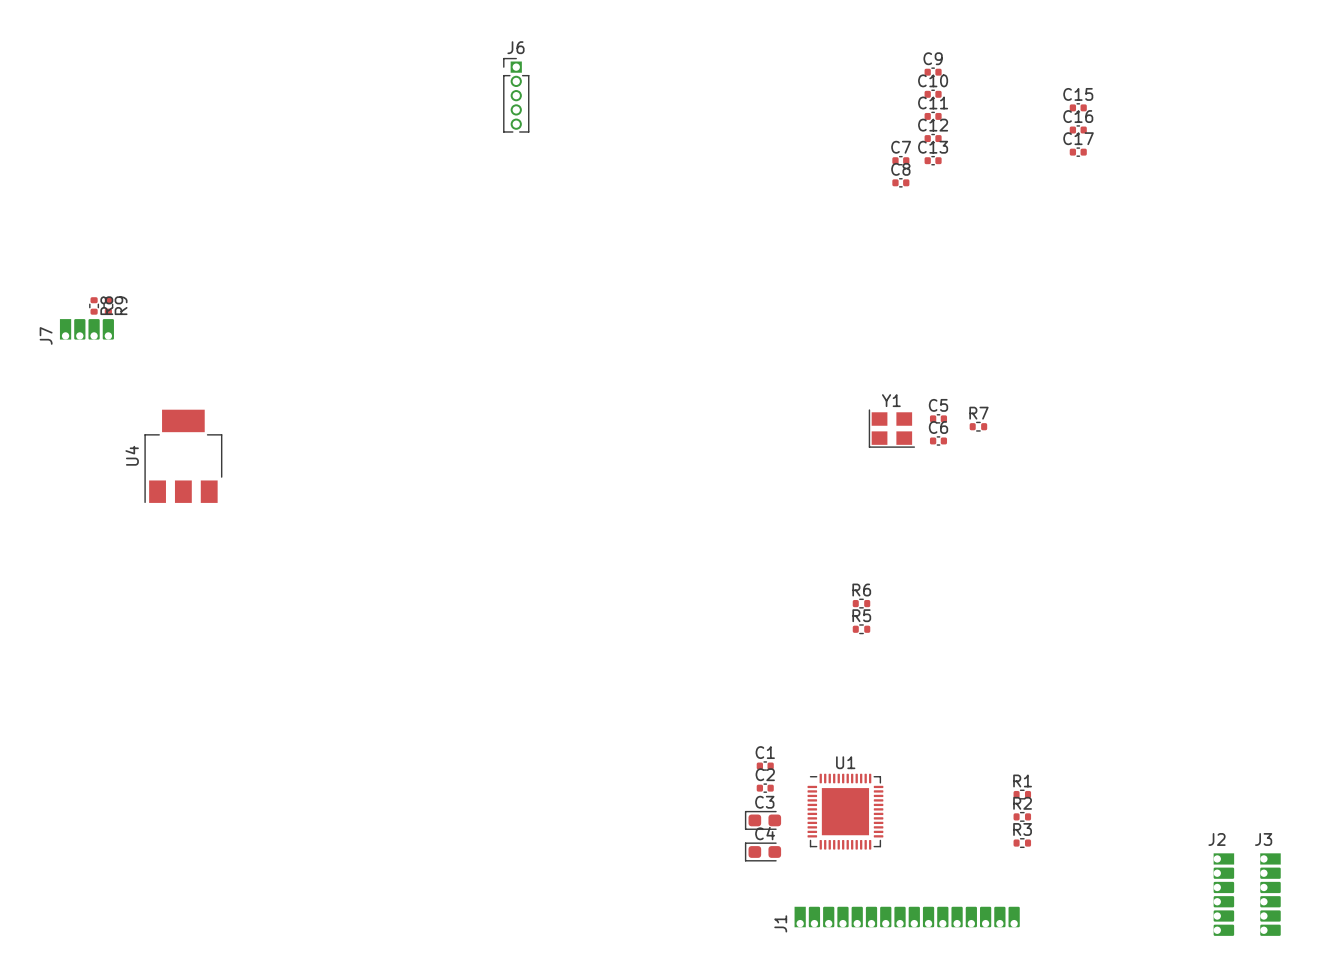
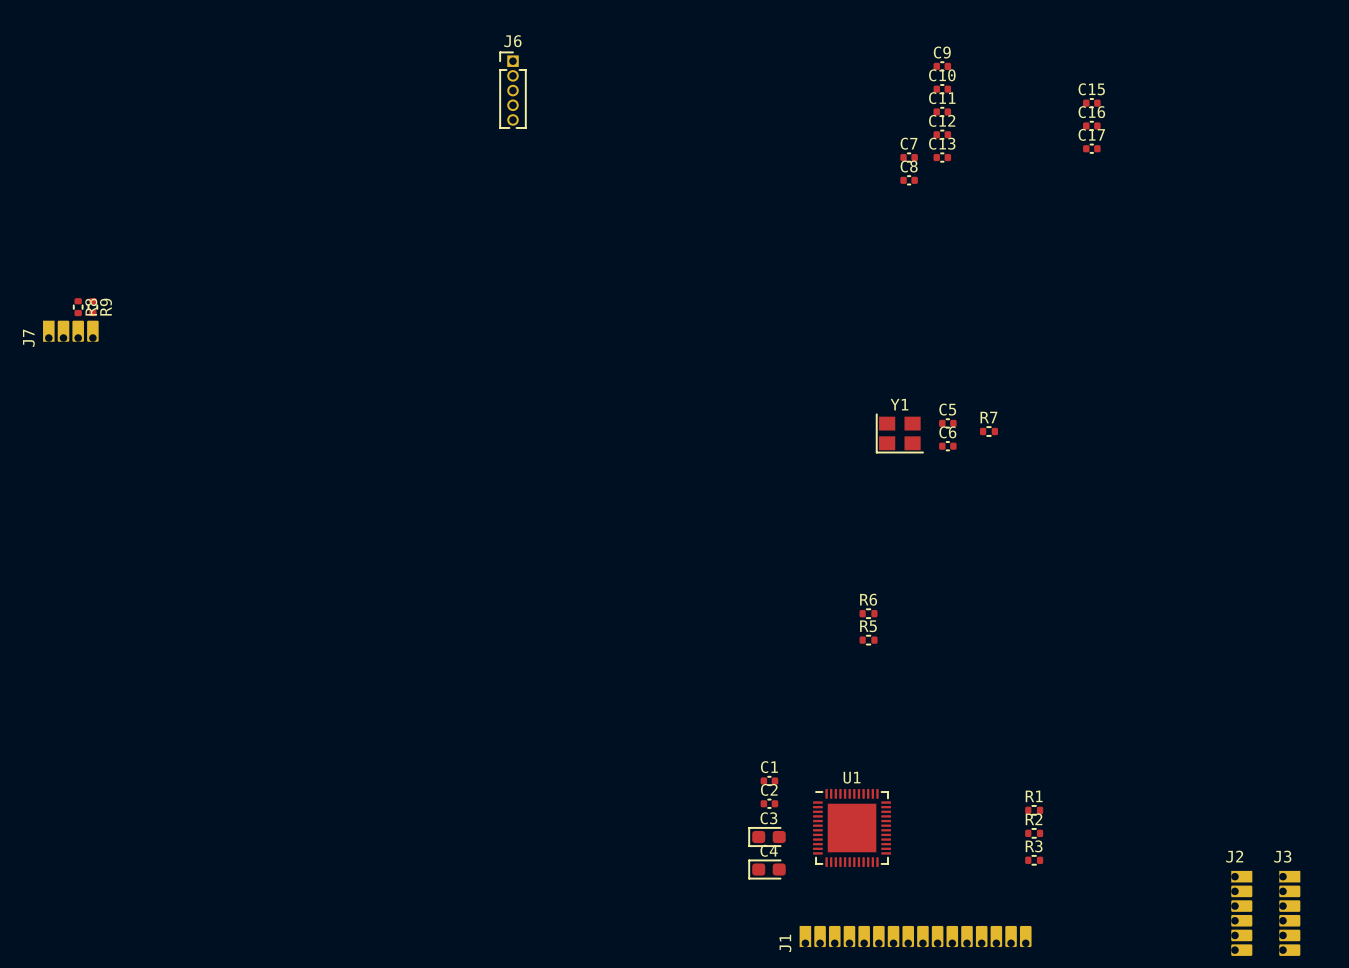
U4: (183, 456) -> none

